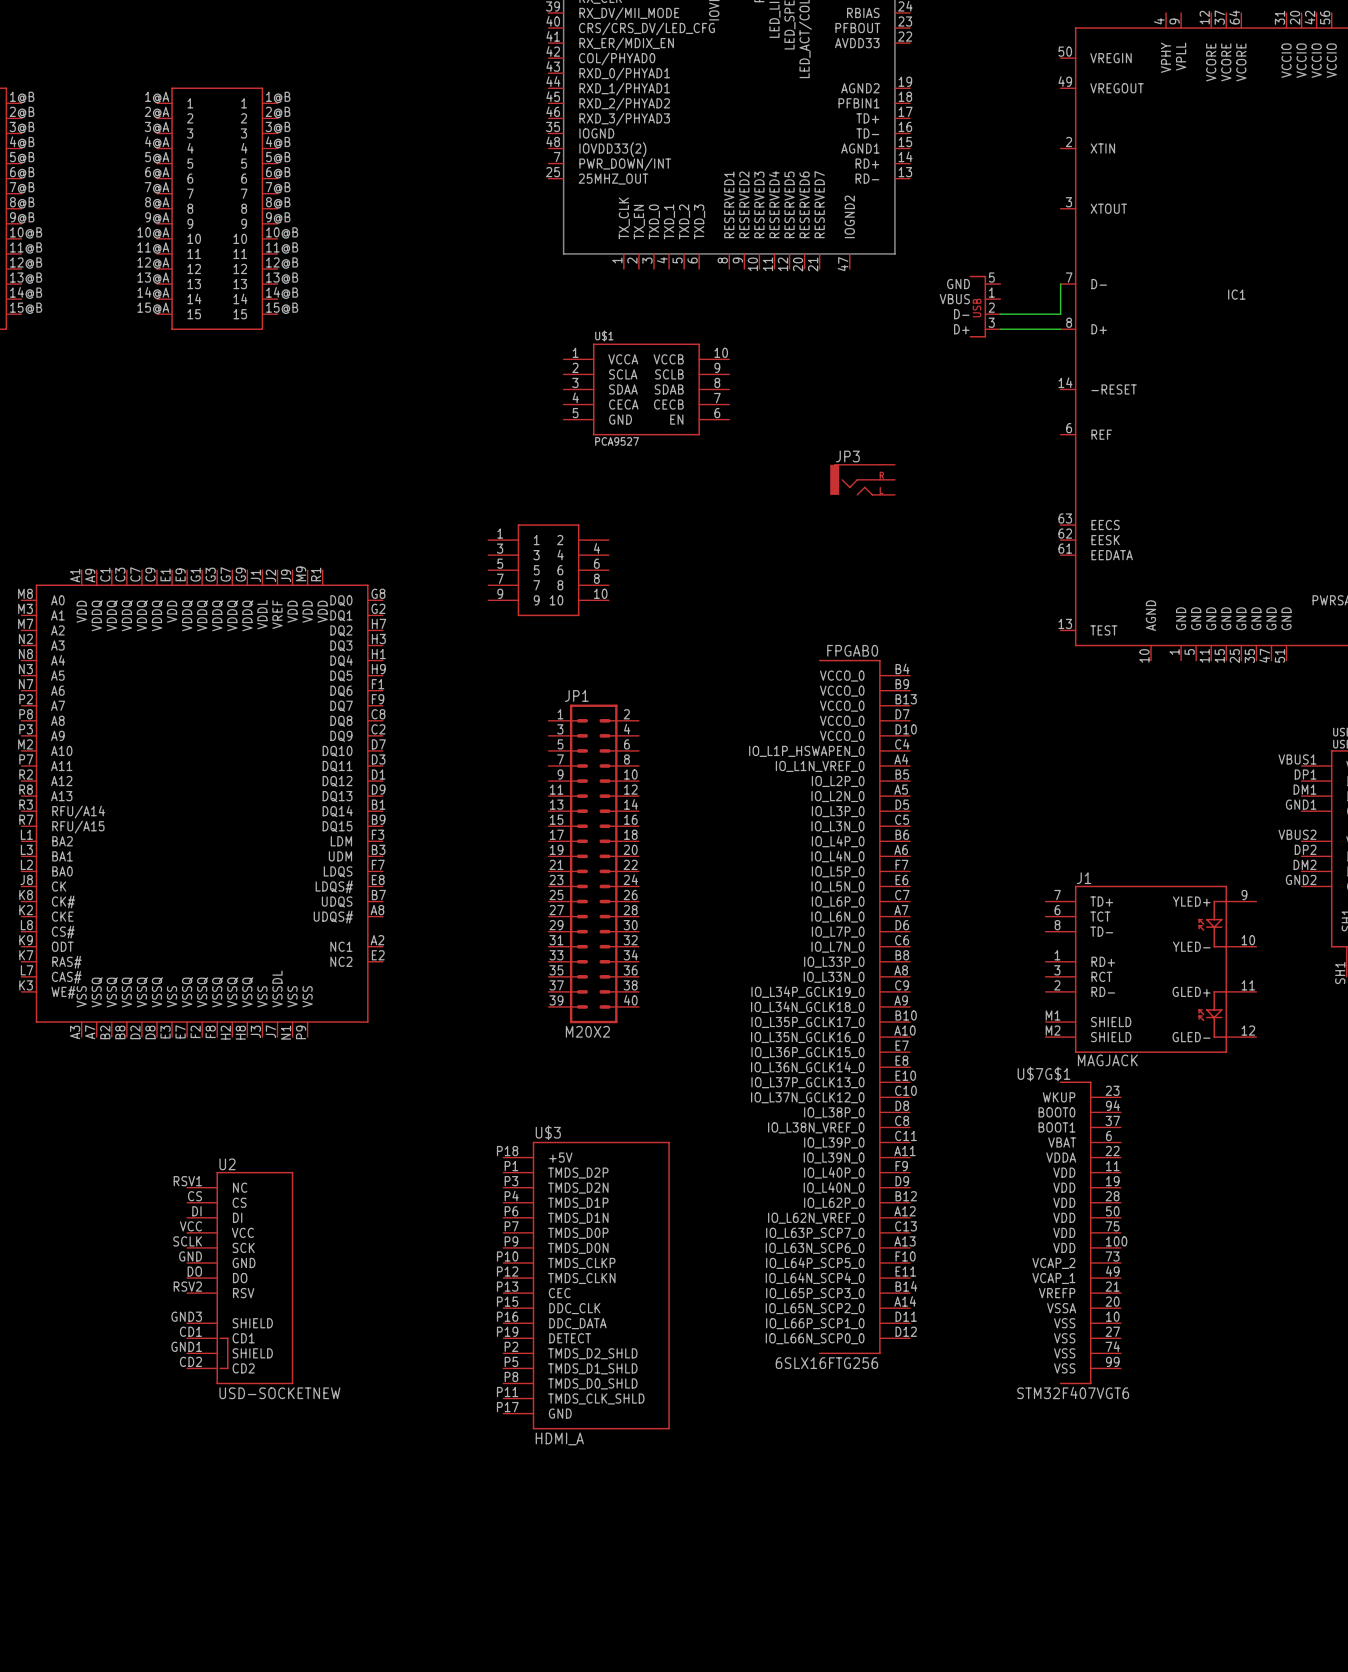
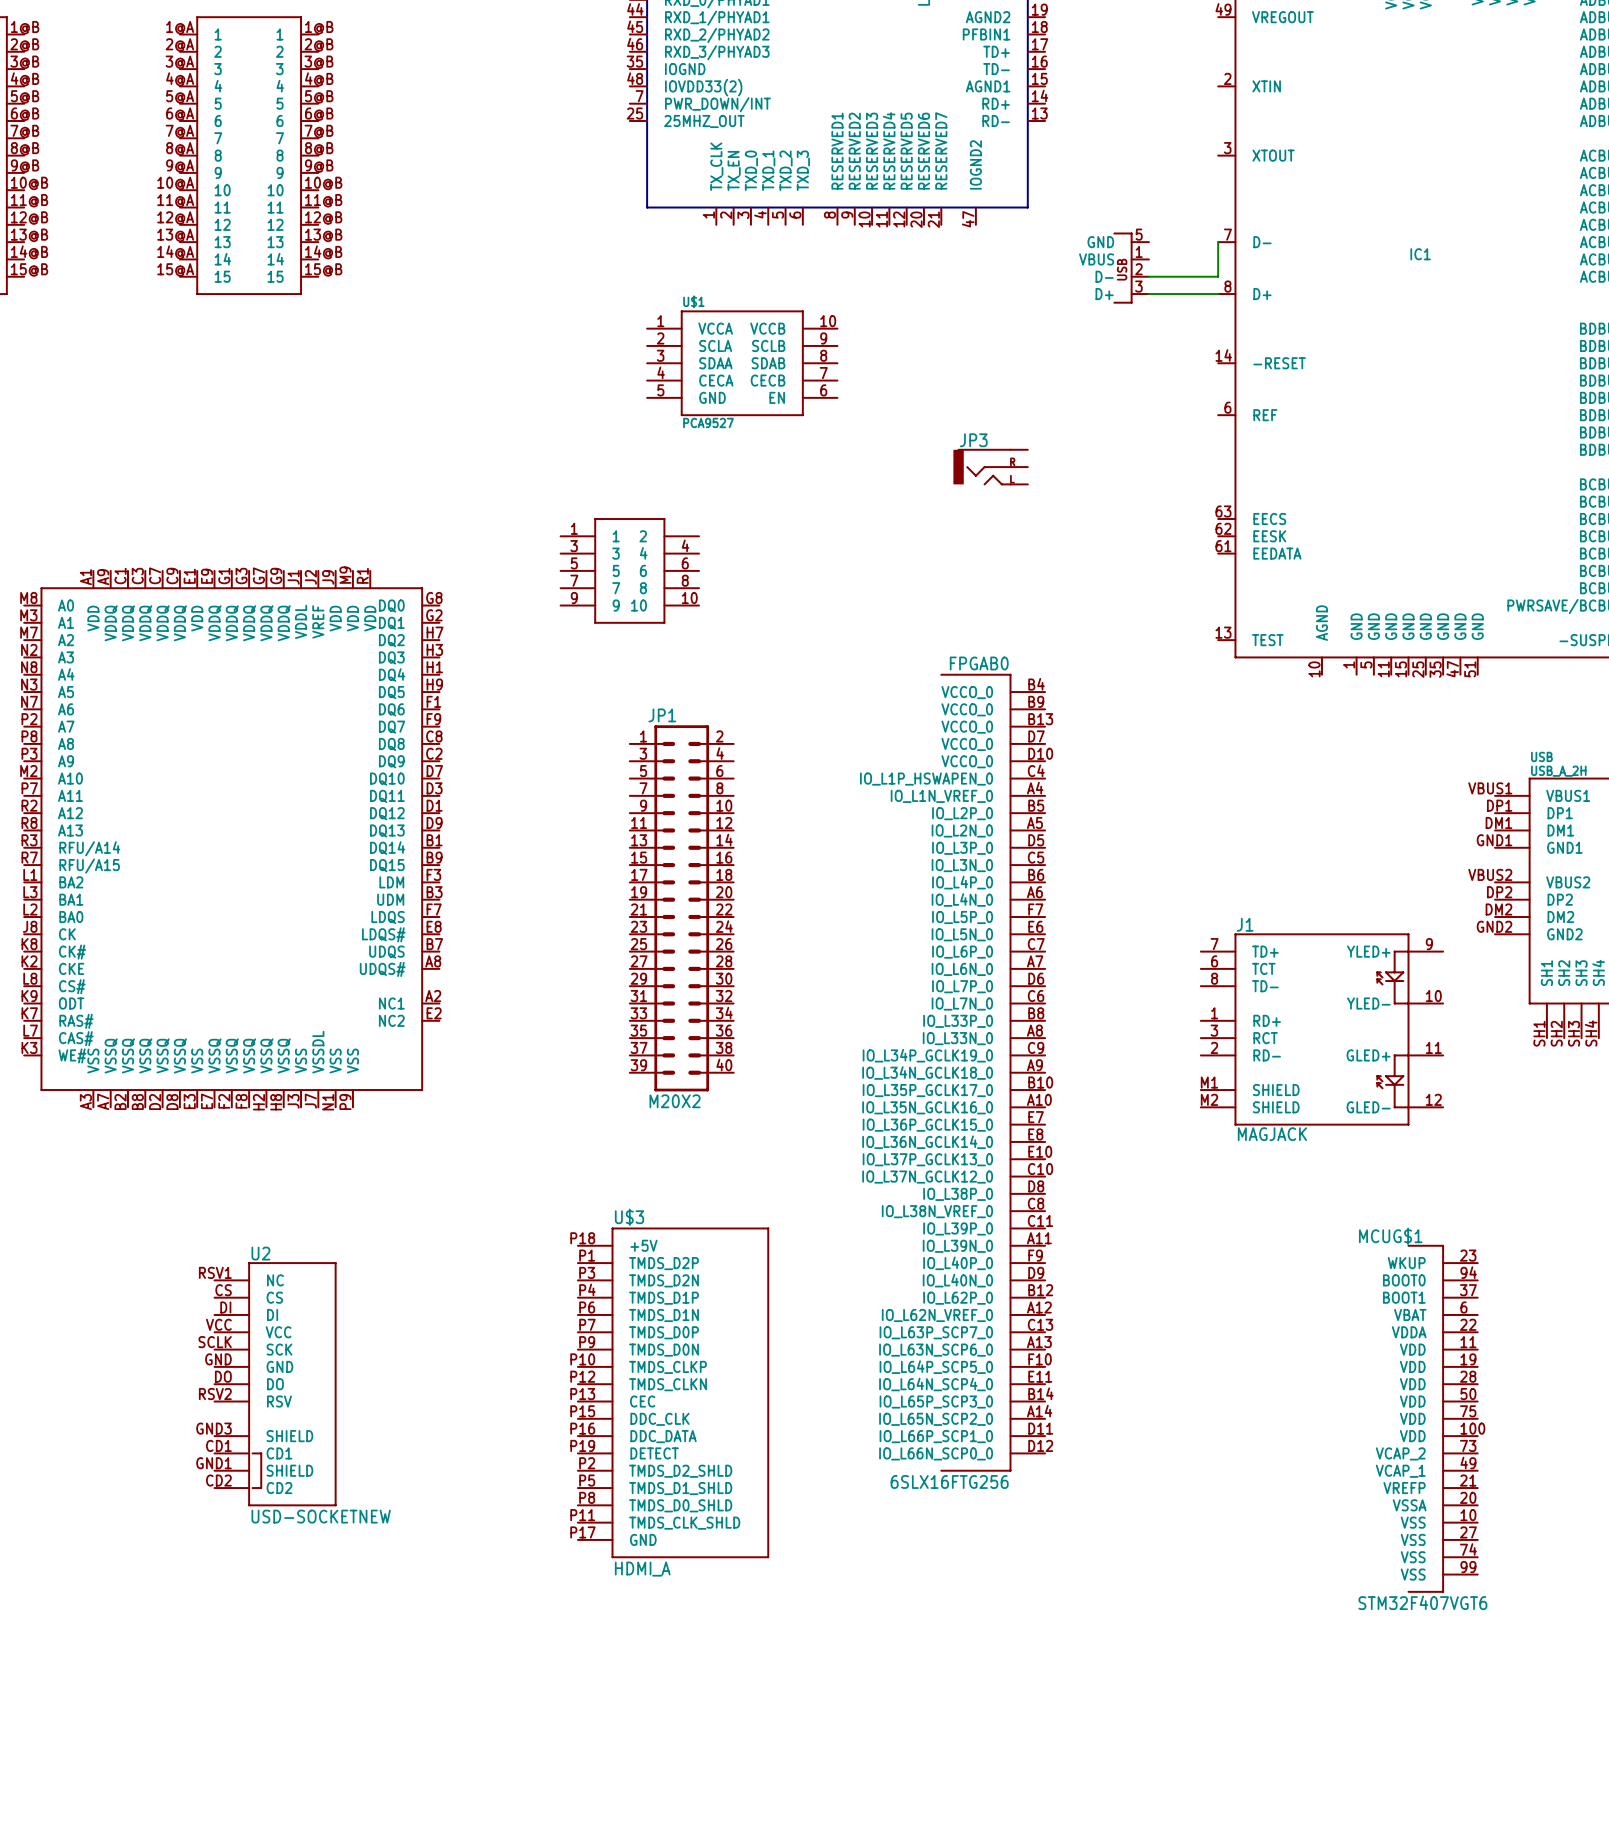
U$7G$1: STM32F407VGT6 (1090, 1232) -> none
MCUG$1: none -> STM32F407VGT6 (1442, 1418)

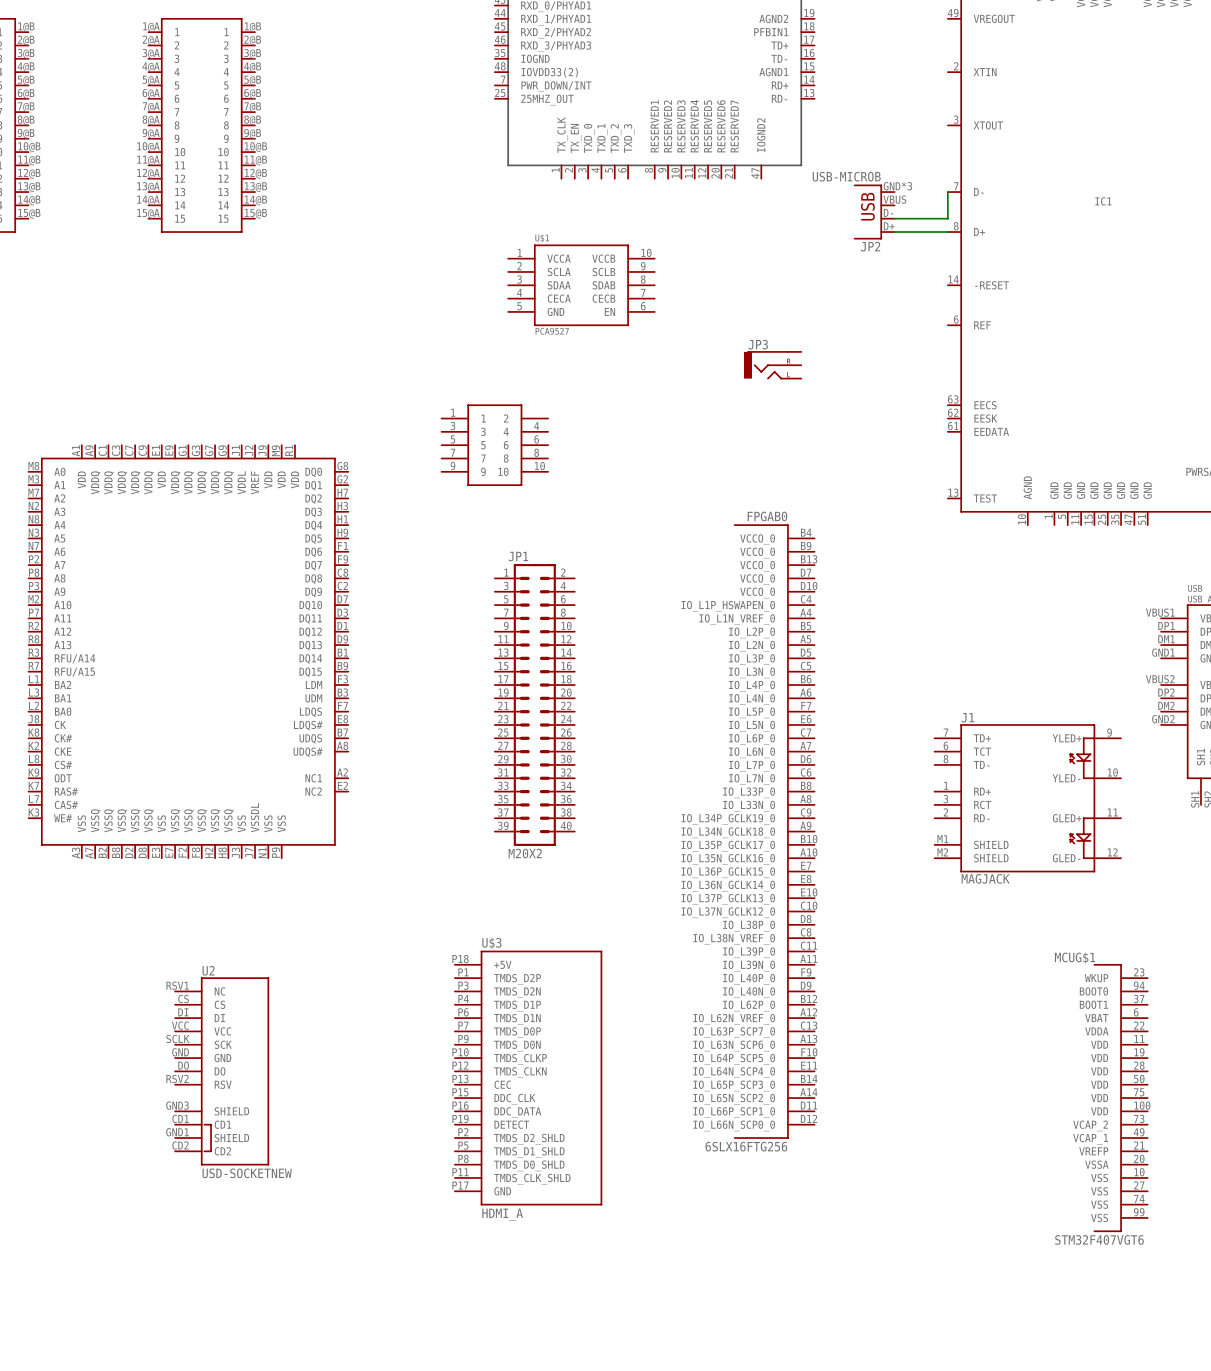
JP2: none -> USB-MICROB (874, 212)
part: (1131, 268) -> none

